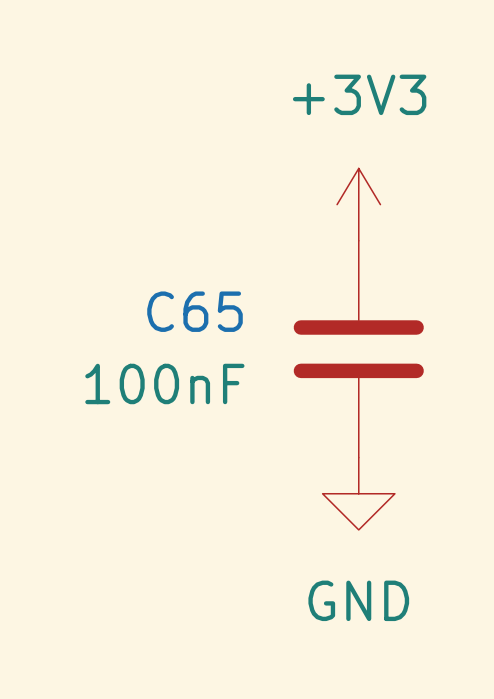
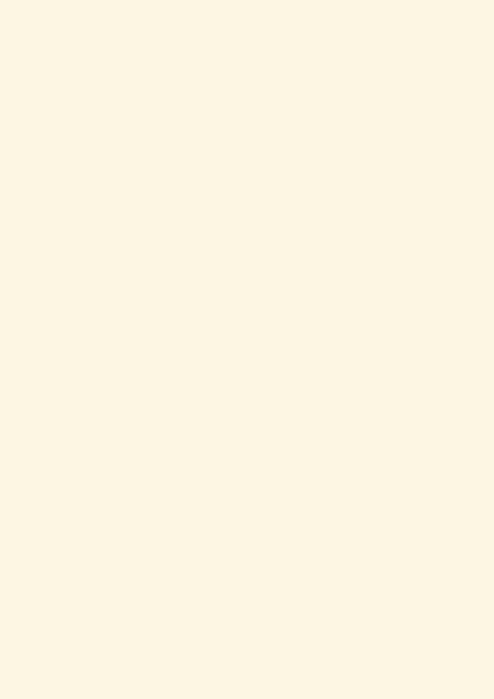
power symbol: +3V3 (358, 204) -> none
C65: 100nF (358, 349) -> none
power symbol: GND (358, 493) -> none

